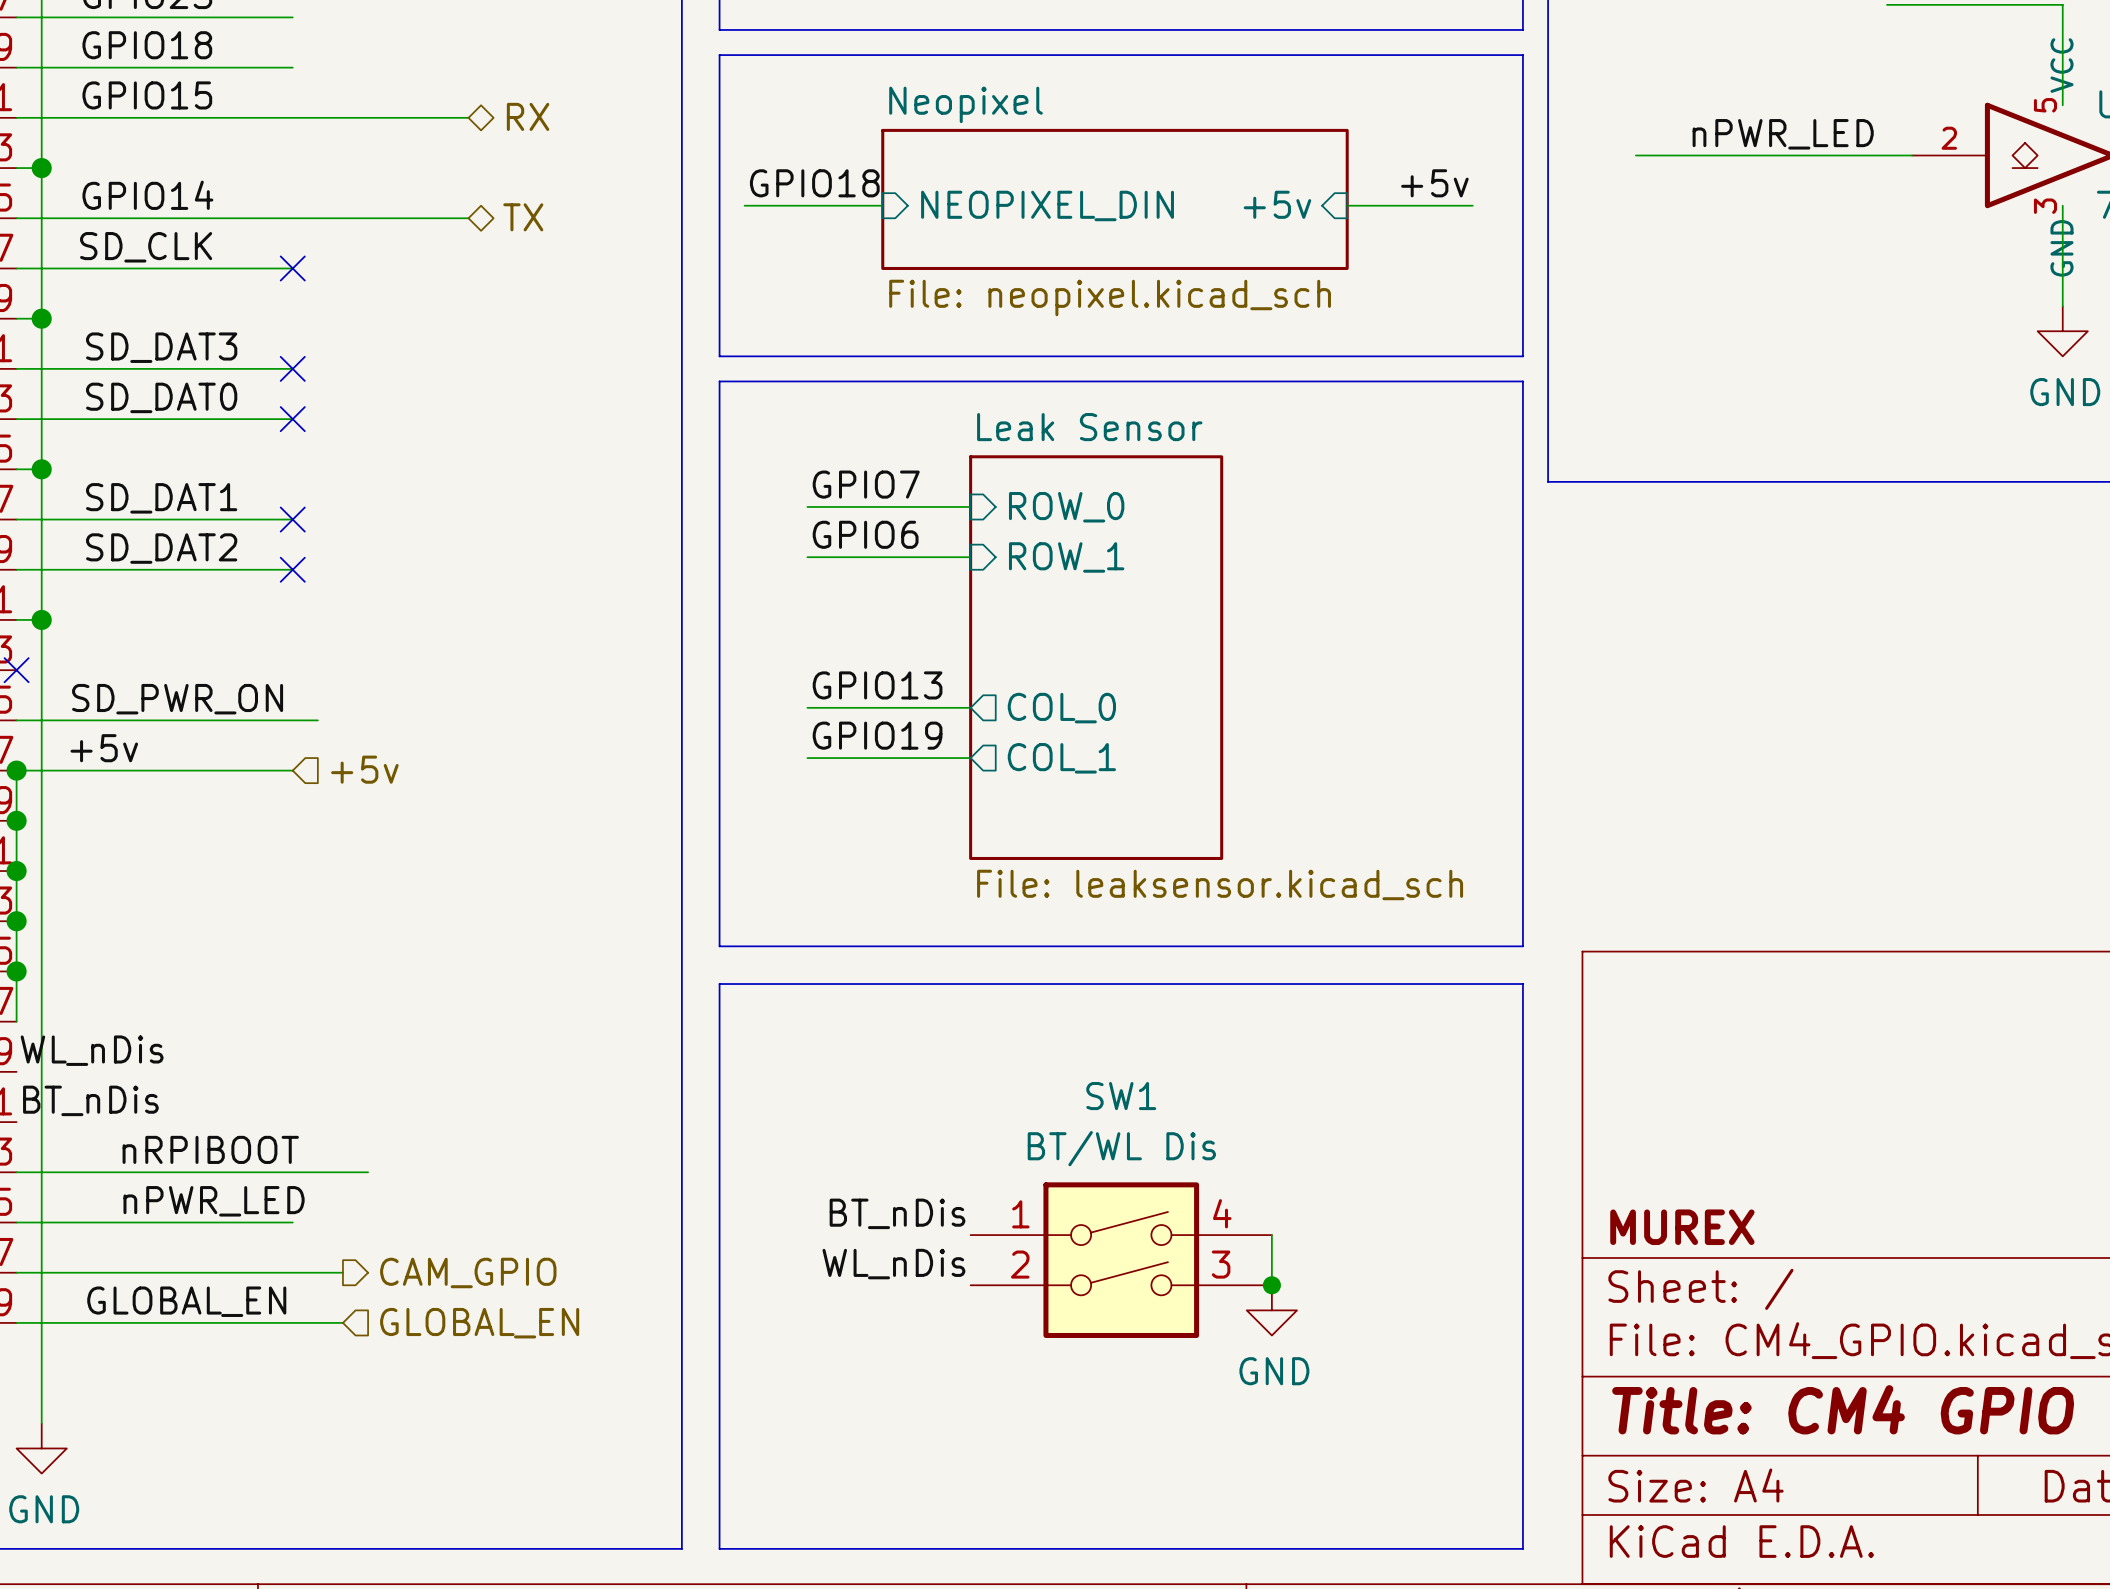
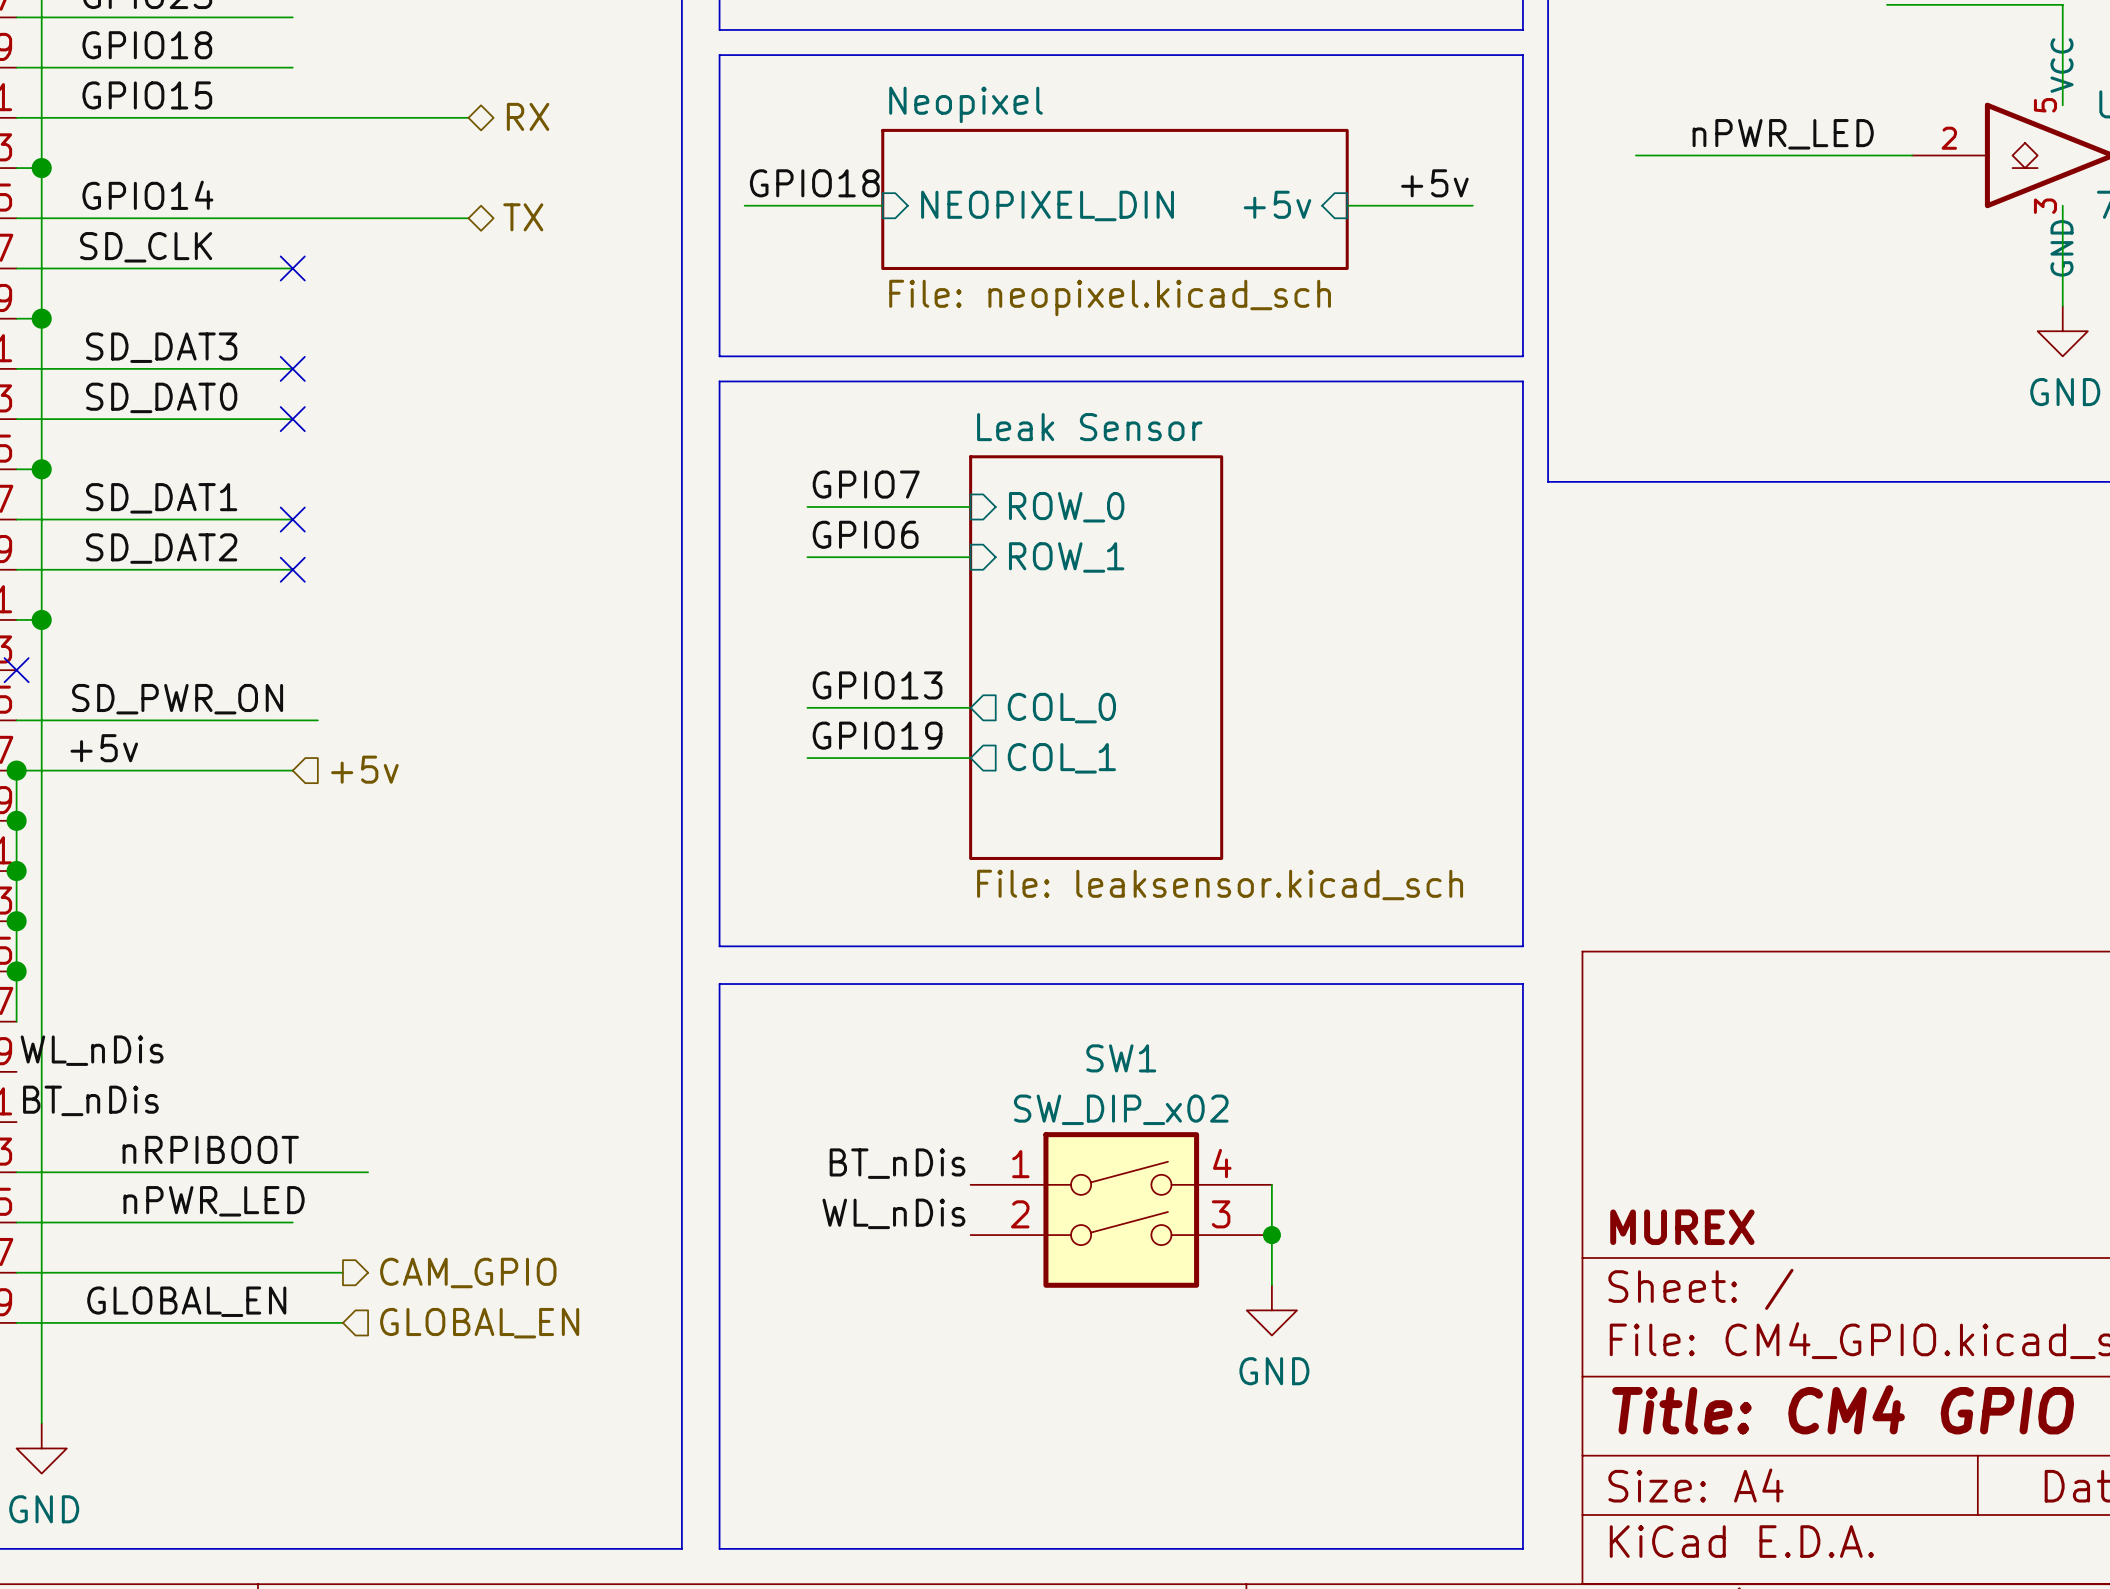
SW1 name position: SW1 (1121, 1096) -> SW1 (1121, 1058)
SW1 value: BT/WL Dis (1121, 1148) -> SW_DIP_x02 (1121, 1109)
label: none -> BT_nDis (897, 1163)
wire: none -> (1271, 1184) (1271, 1235)
label: BT_nDis (897, 1213) -> WL_nDis (893, 1213)
SW1 position: (1121, 1260) -> (1121, 1209)
label: WL_nDis (893, 1264) -> none
junction position: (1271, 1285) -> (1271, 1235)

